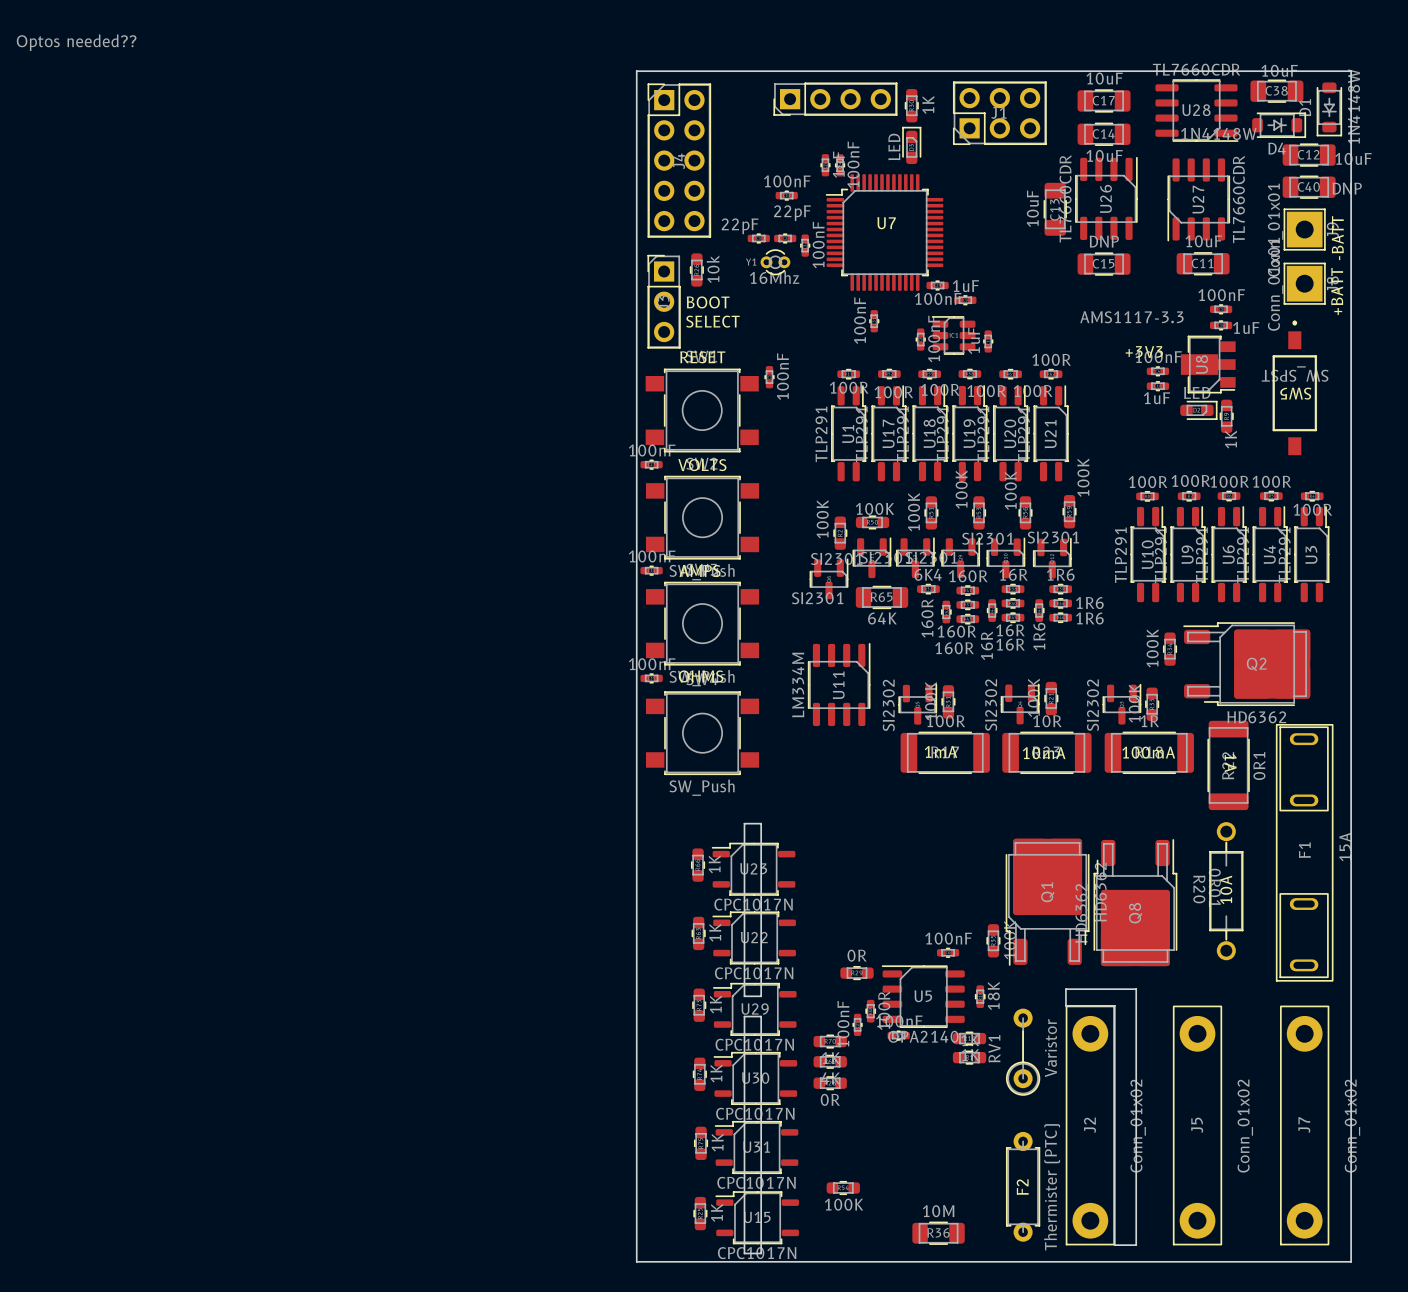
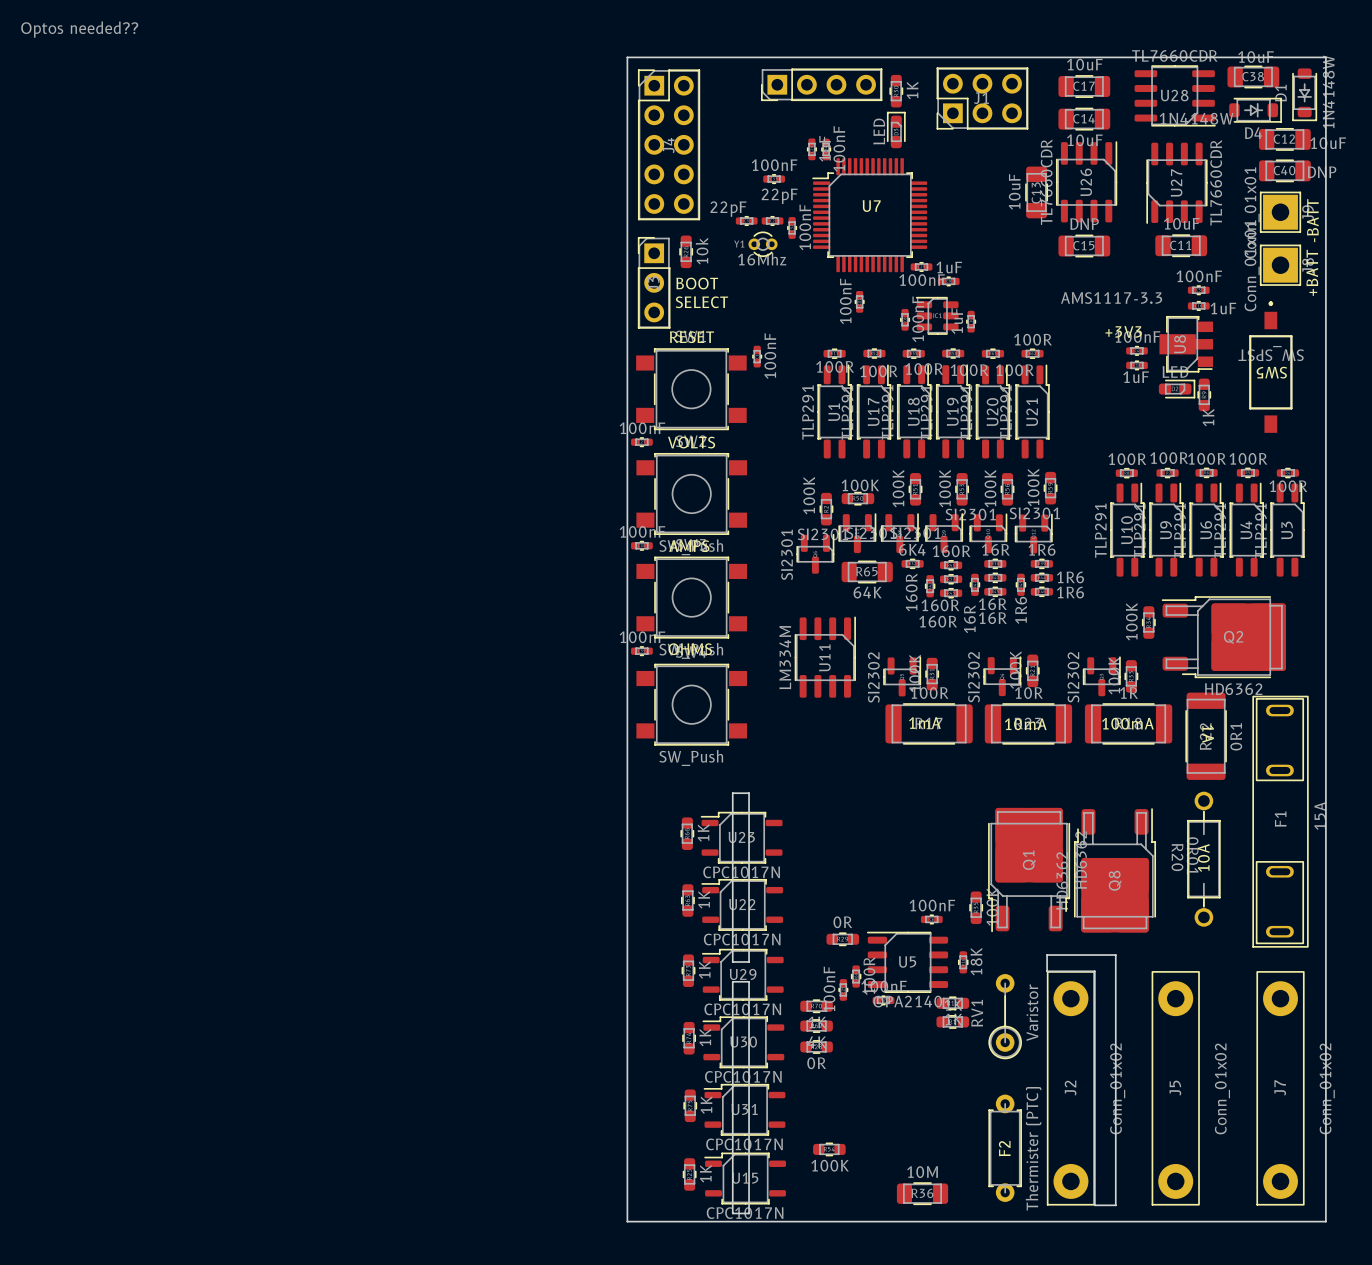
part value position: 100K (1083, 477) -> 100K (1033, 487)
part value position: 100K (961, 489) -> 100K (945, 488)
part value position: 100K (1010, 490) -> 100K (990, 488)
part value rotation: 0° (817, 598) -> 90° counterclockwise (787, 554)

